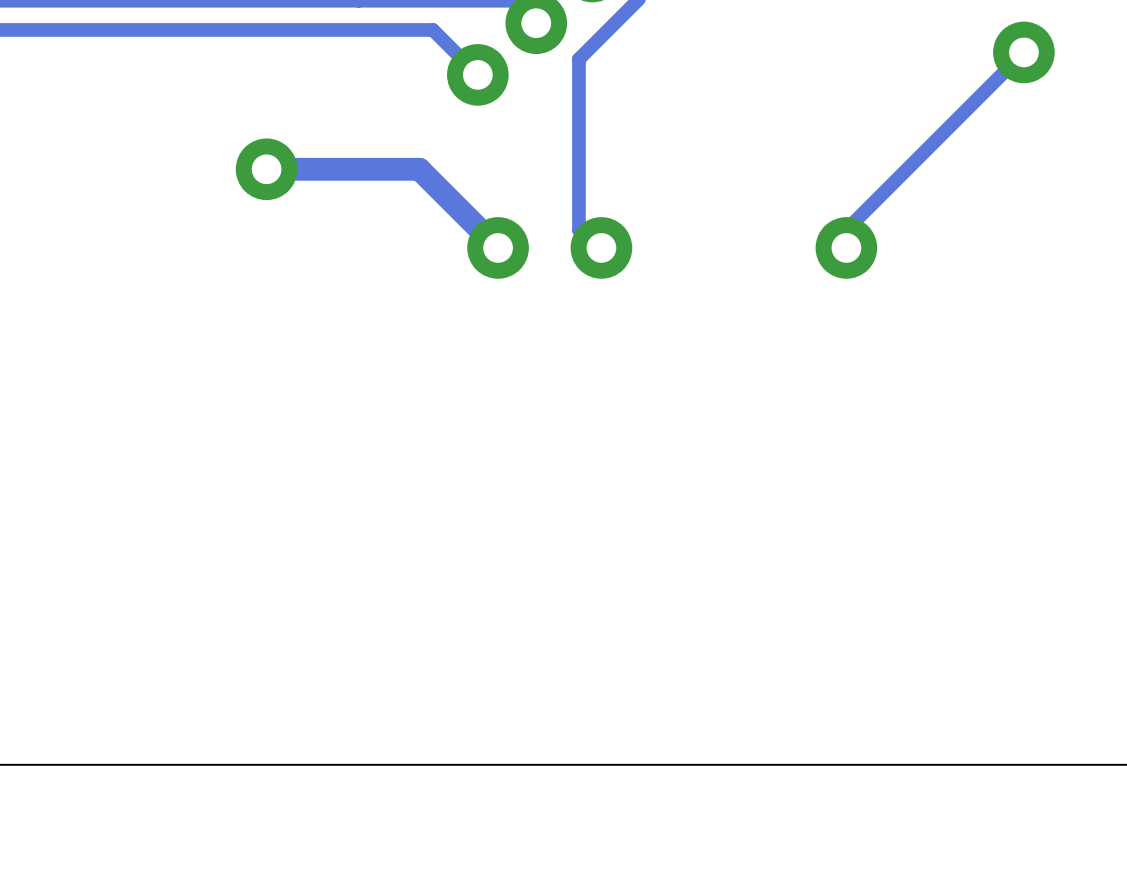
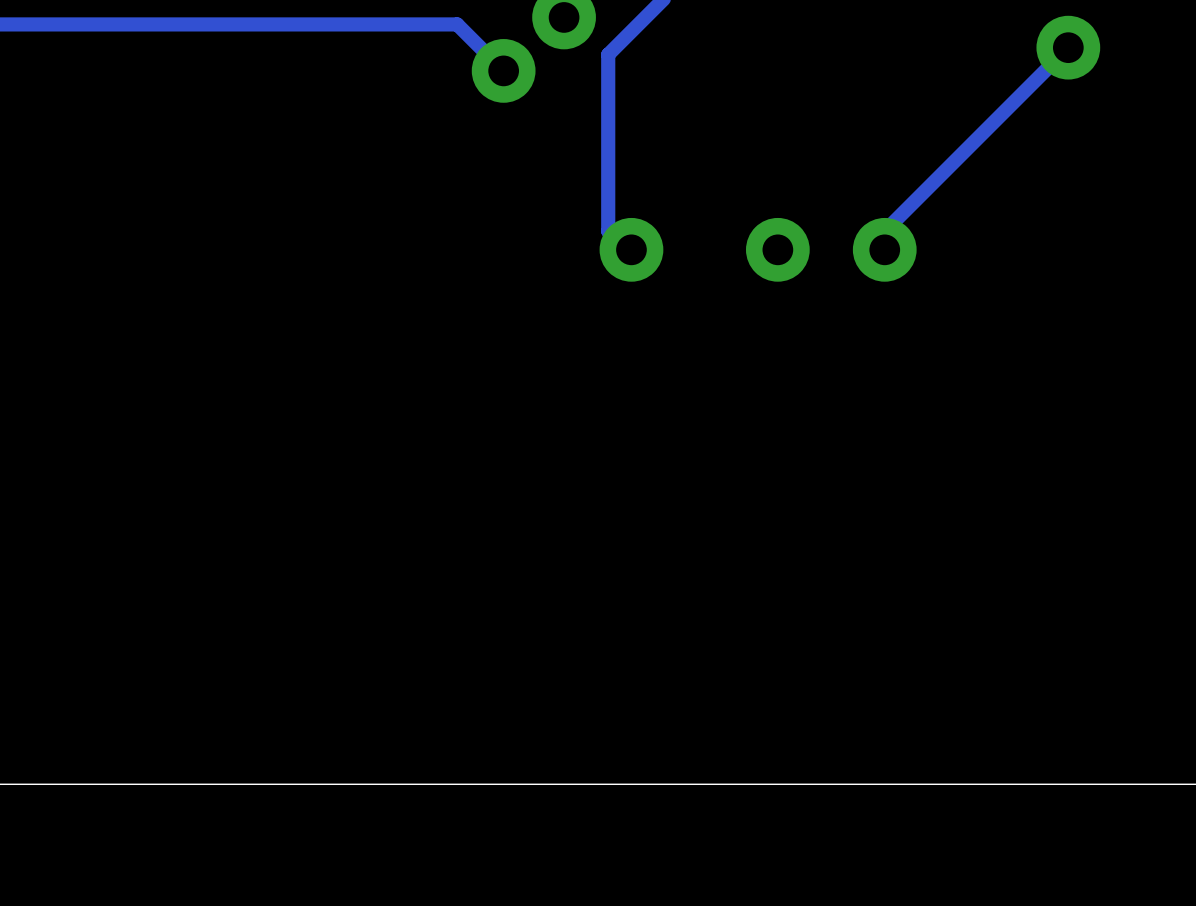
track: (266, 169) (419, 169) (498, 247) -> none
via: (266, 169) -> none
via: (498, 247) -> none
via: none -> (777, 249)

